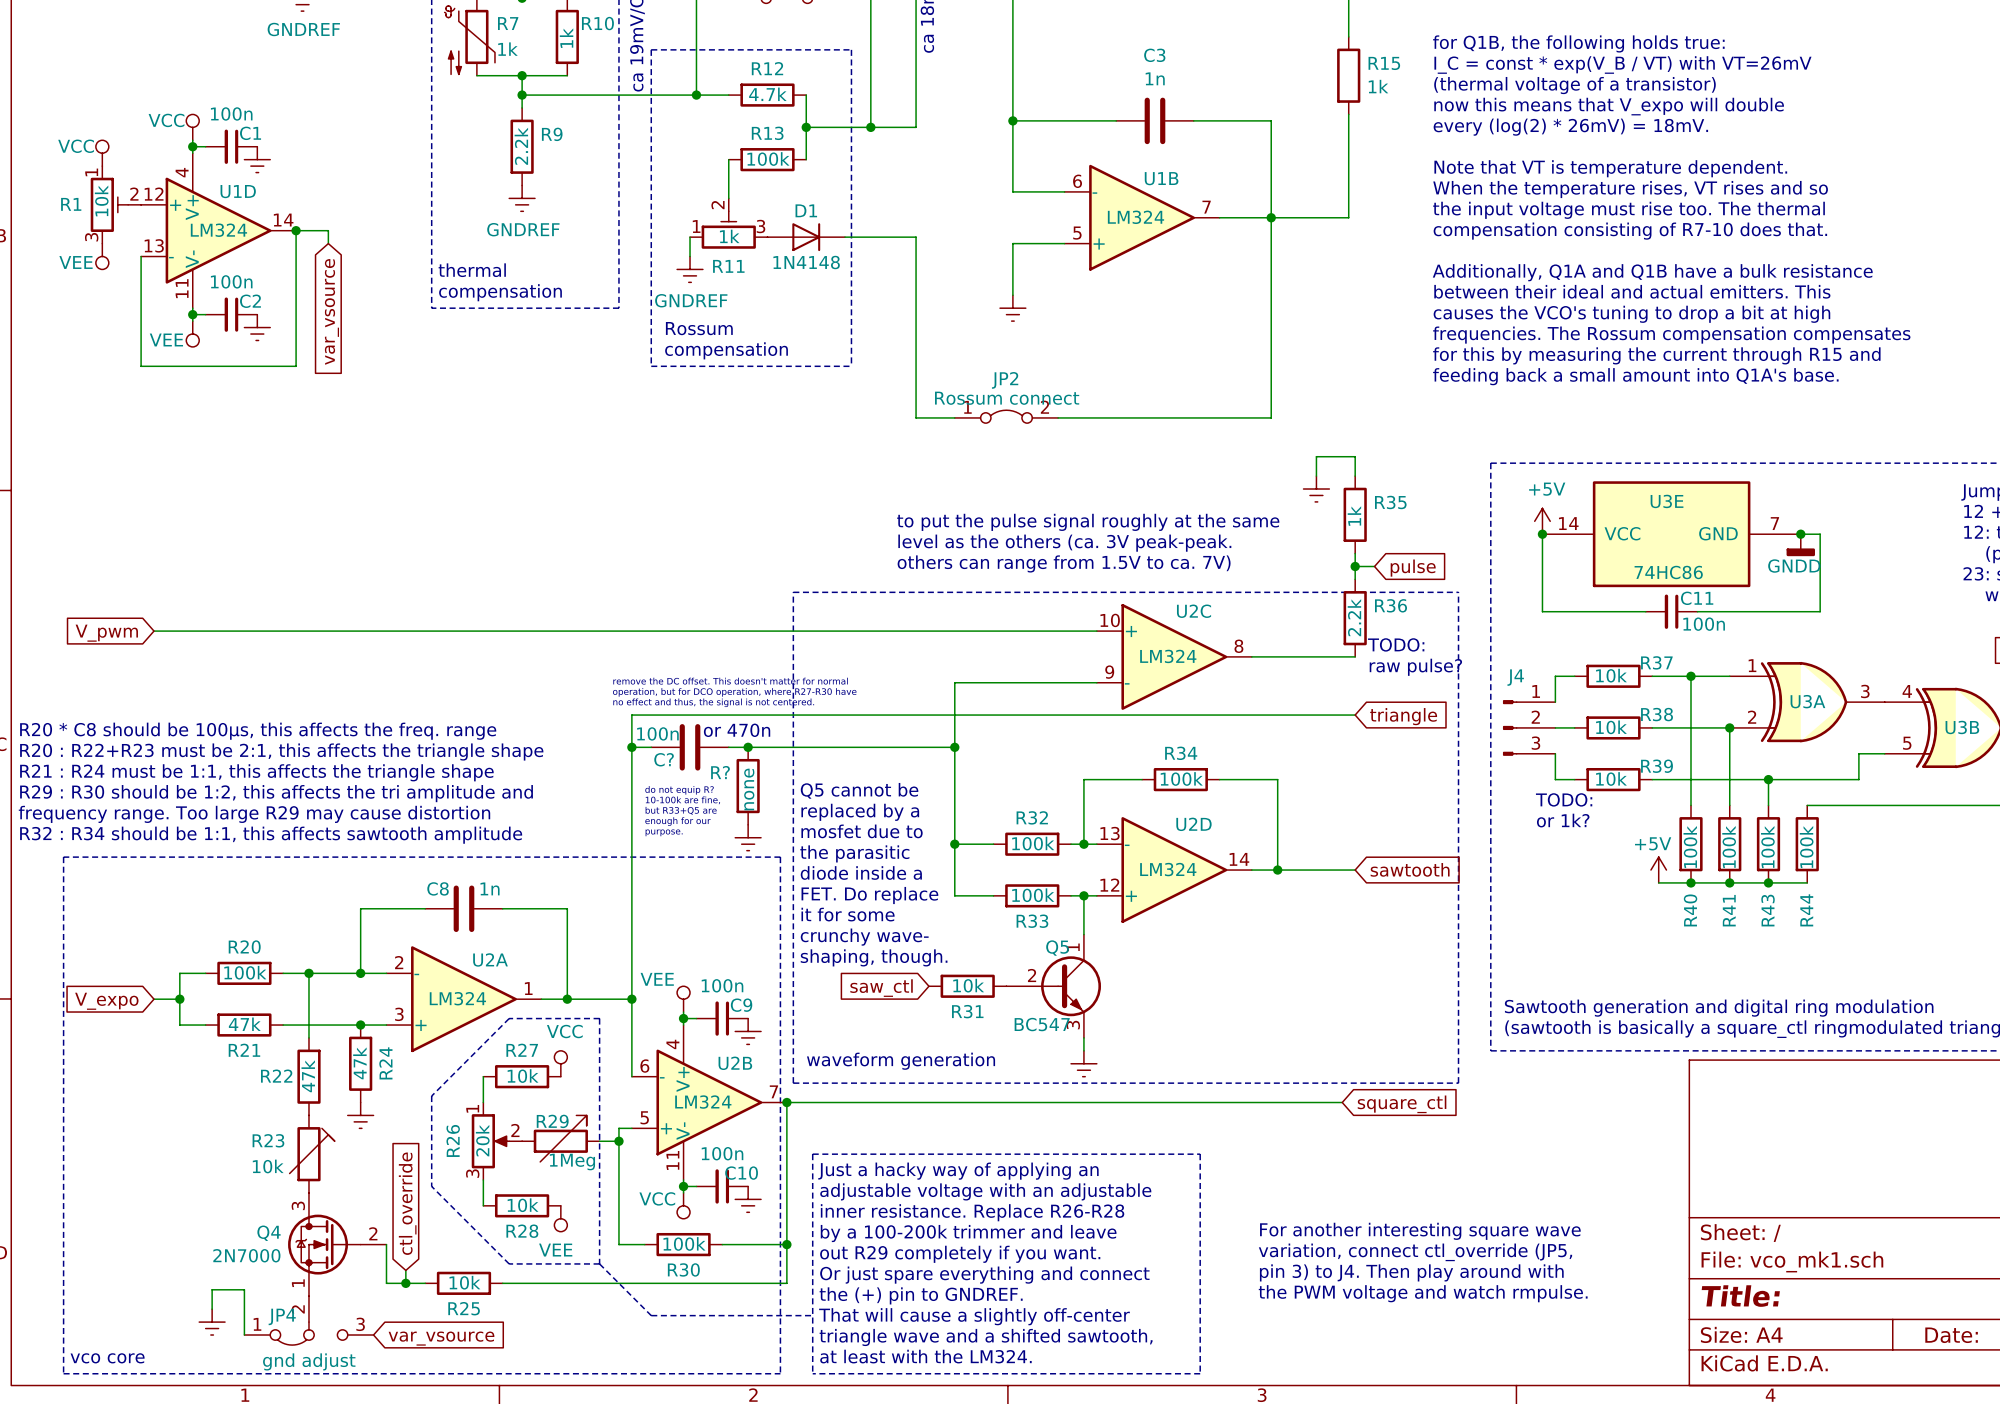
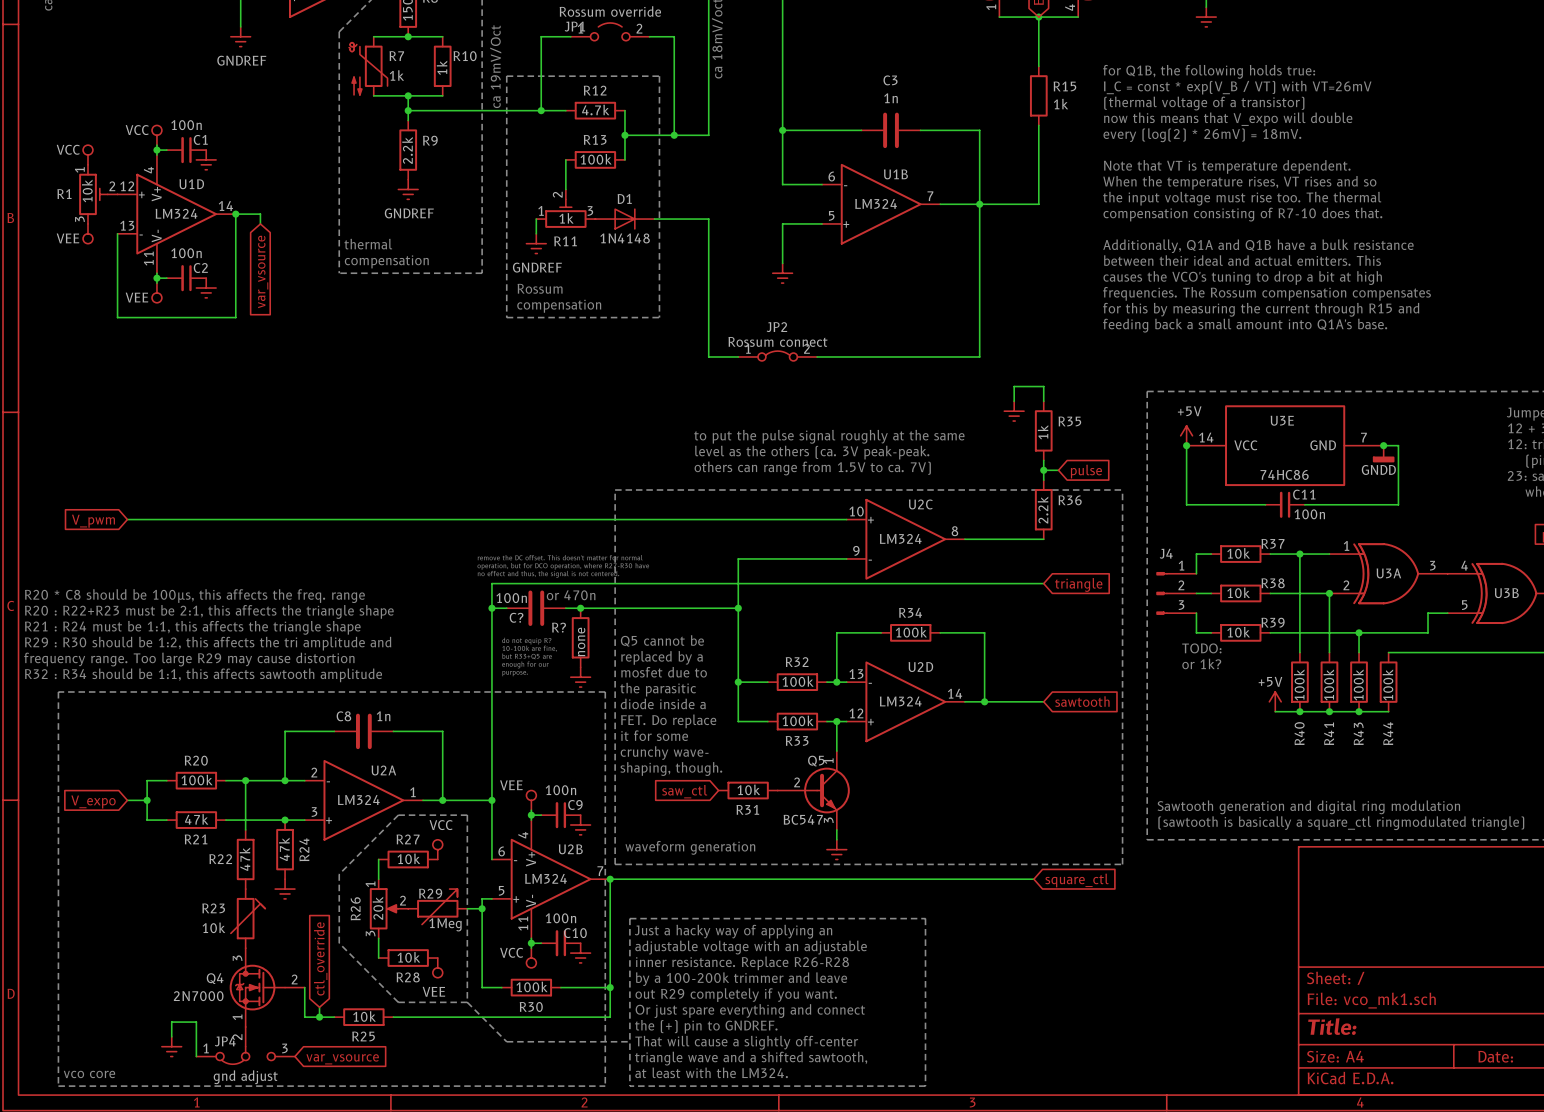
text: TODO: (1396, 644) -> none
text: raw pulse? (1415, 667) -> none
text: For another interesting square wave (1420, 1231) -> none
text: variation, connect ctl_override (JP5, (1415, 1252) -> none
text: pin 3) to J4. Then play around with (1411, 1272) -> none
text: the PWM voltage and watch rmpulse. (1423, 1293) -> none

